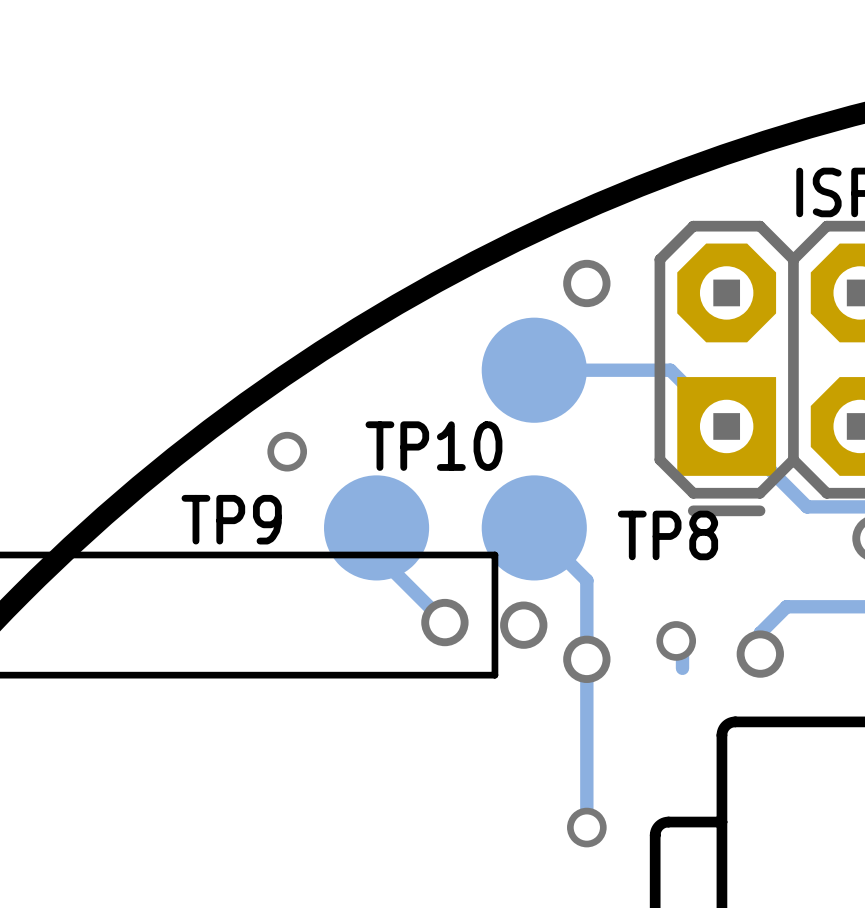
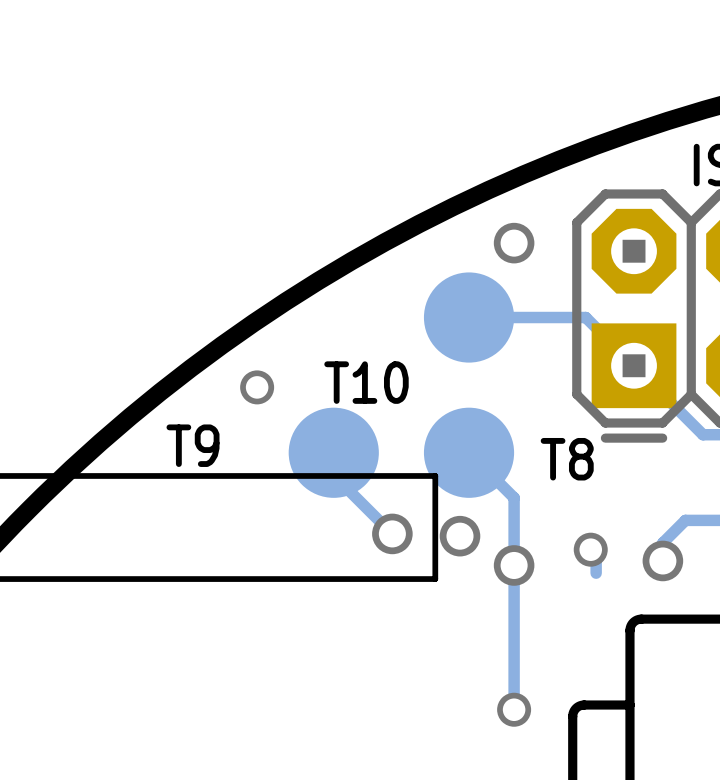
TP10 name: TP10 (433, 446) -> T10 (366, 382)
TP9 name: TP9 (231, 519) -> T9 (193, 445)
TP8 name: TP8 (667, 535) -> T8 (567, 459)

